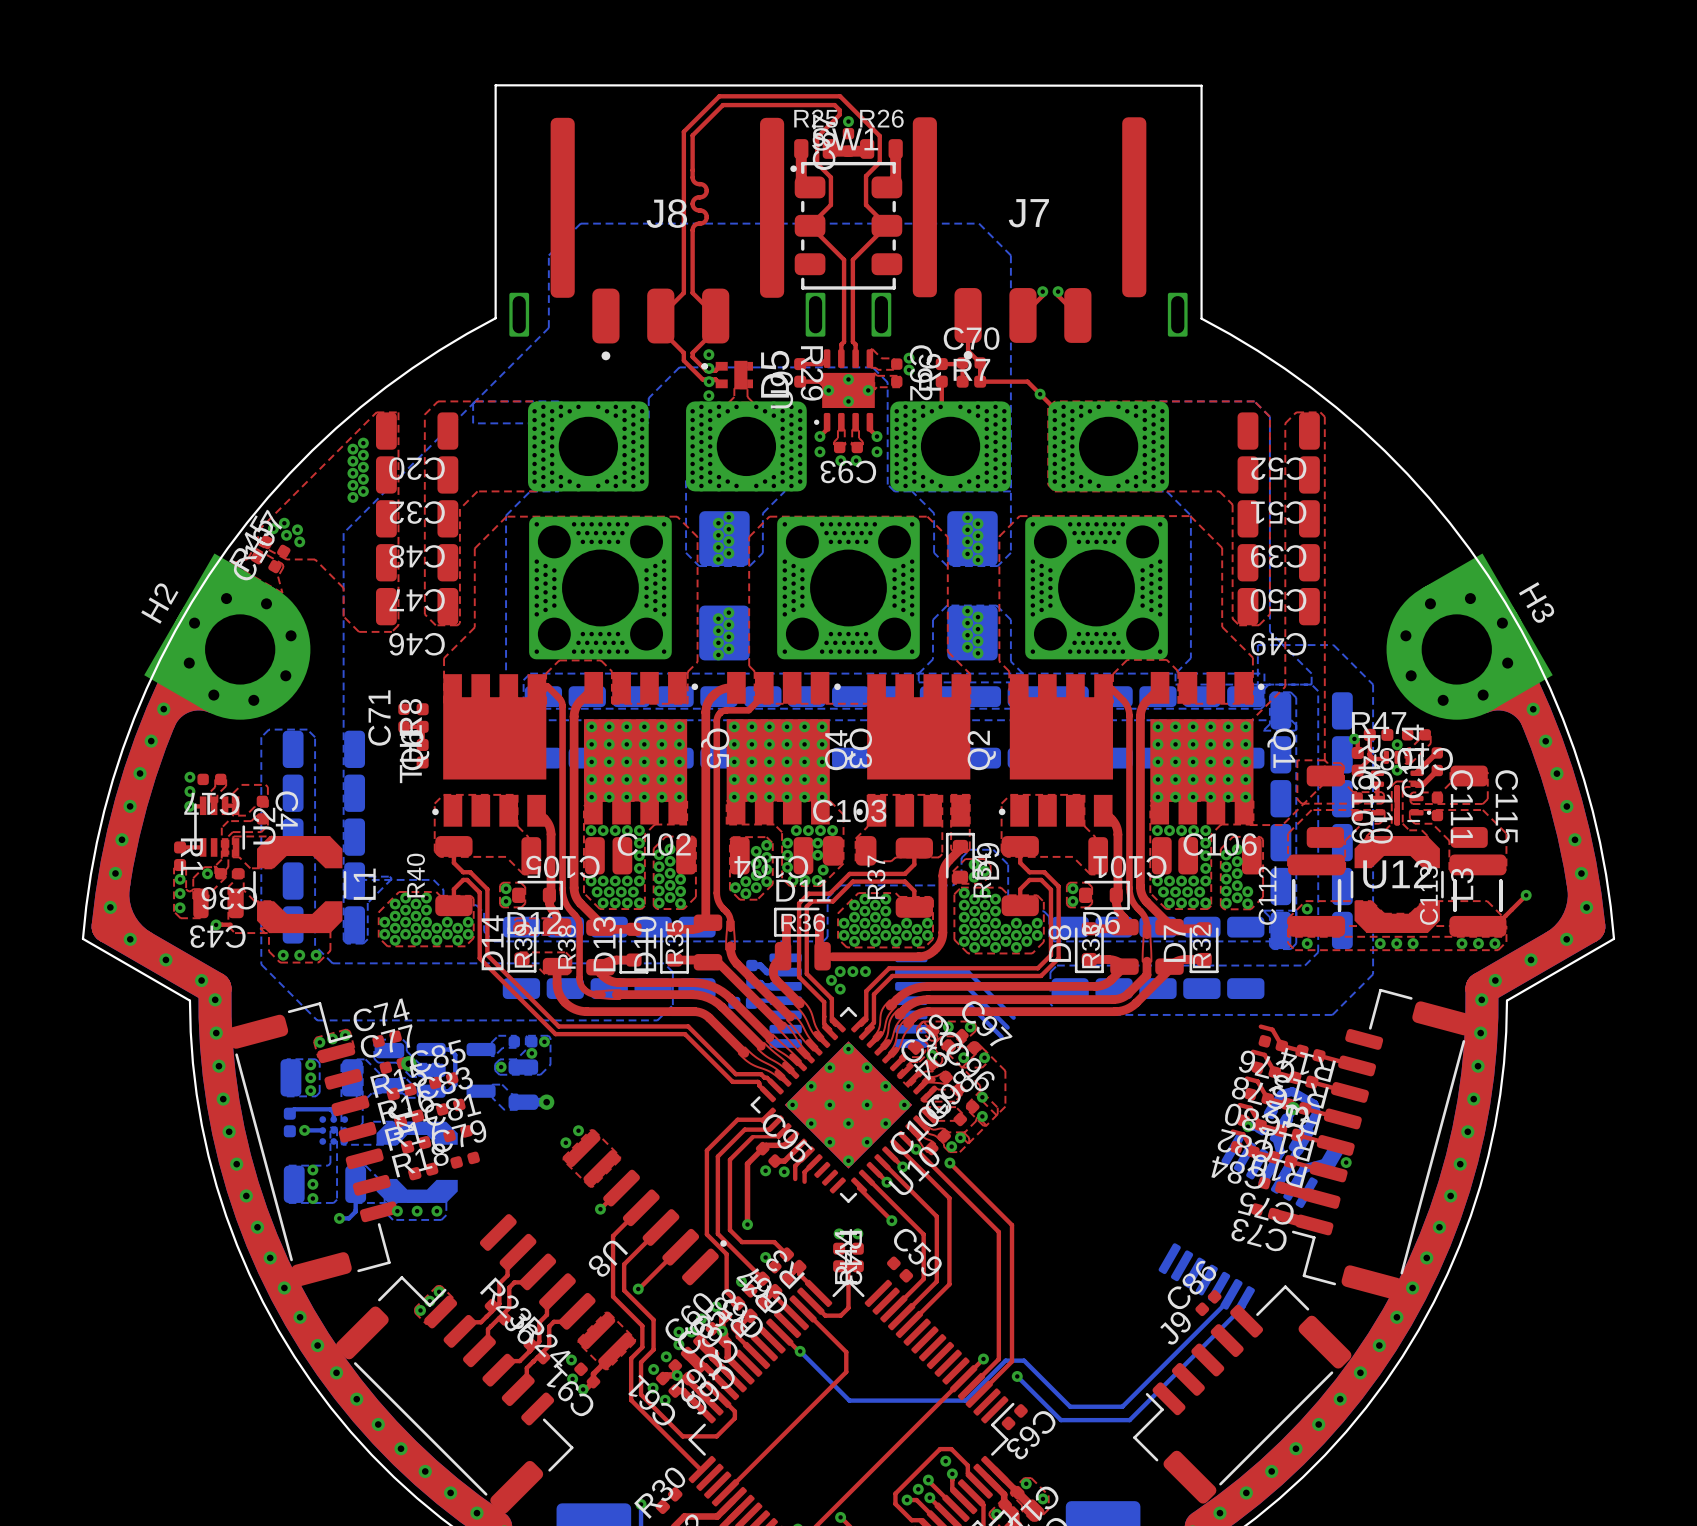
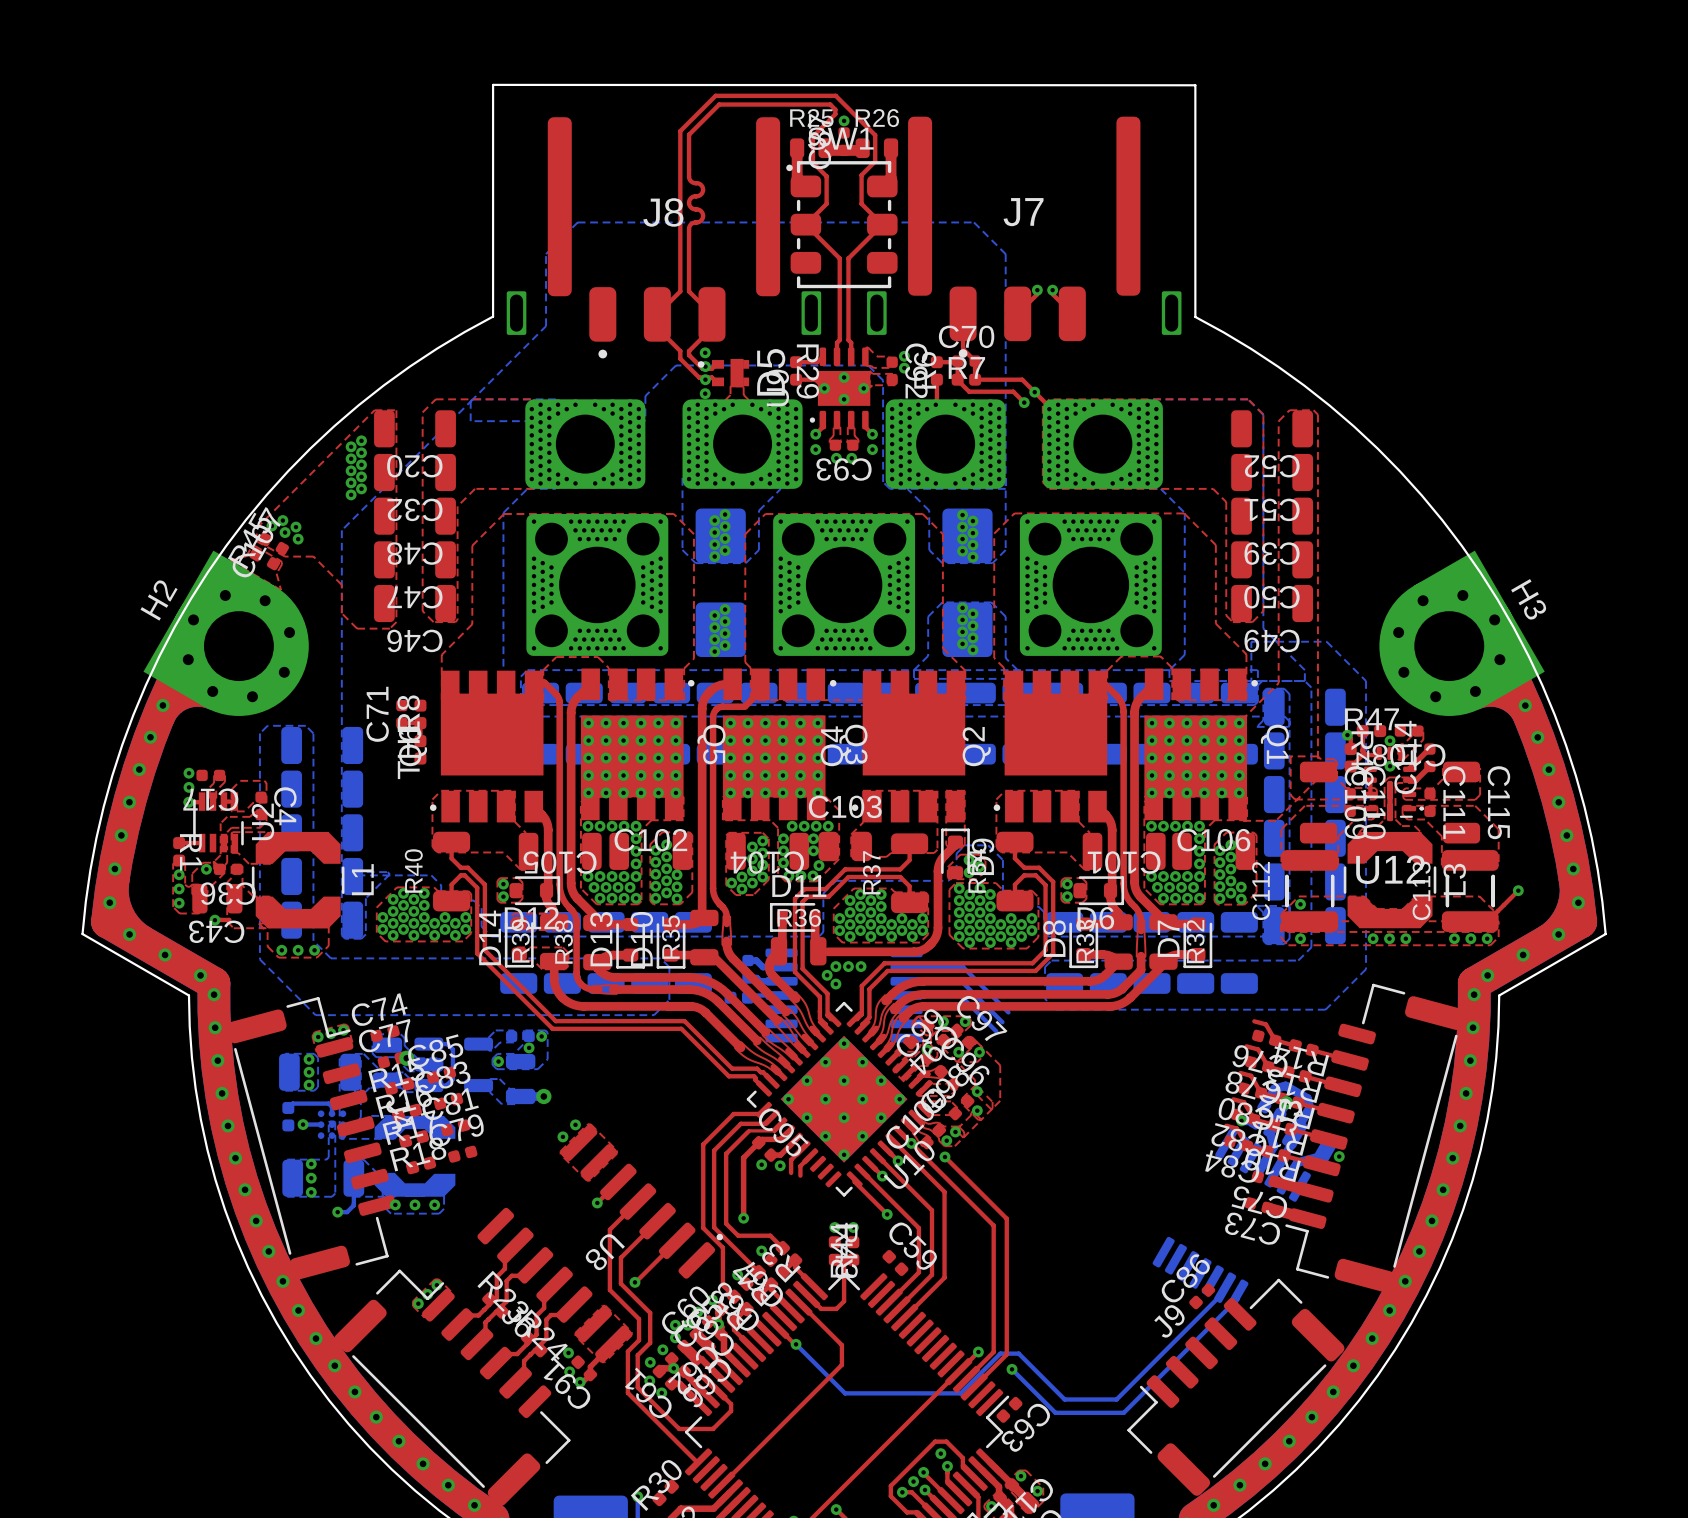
top track: none -> (957, 380) (969, 391) (1013, 391) (1024, 402)
via: none -> (1024, 402)

